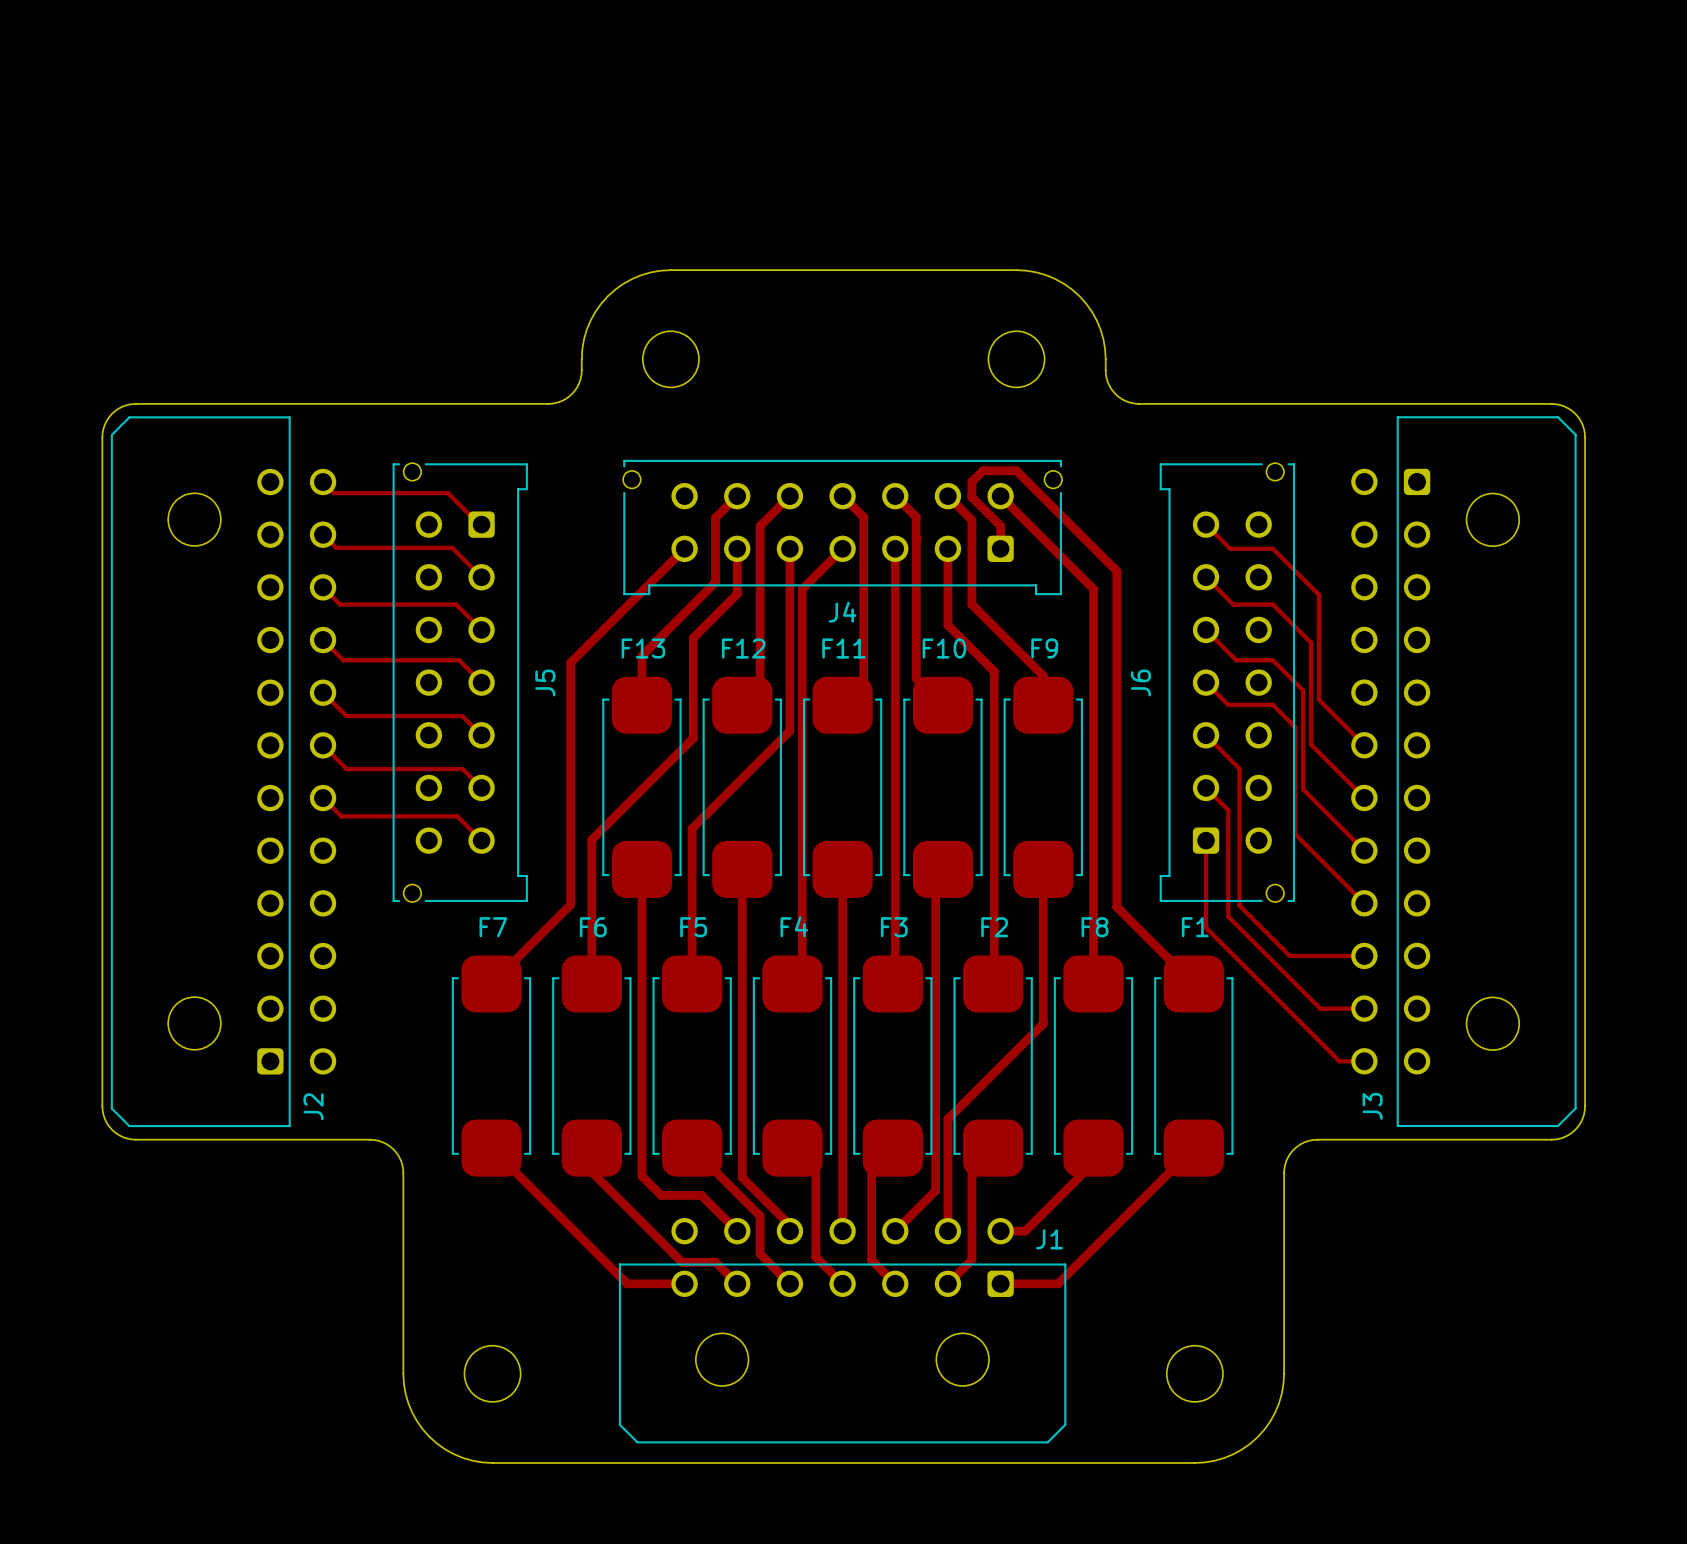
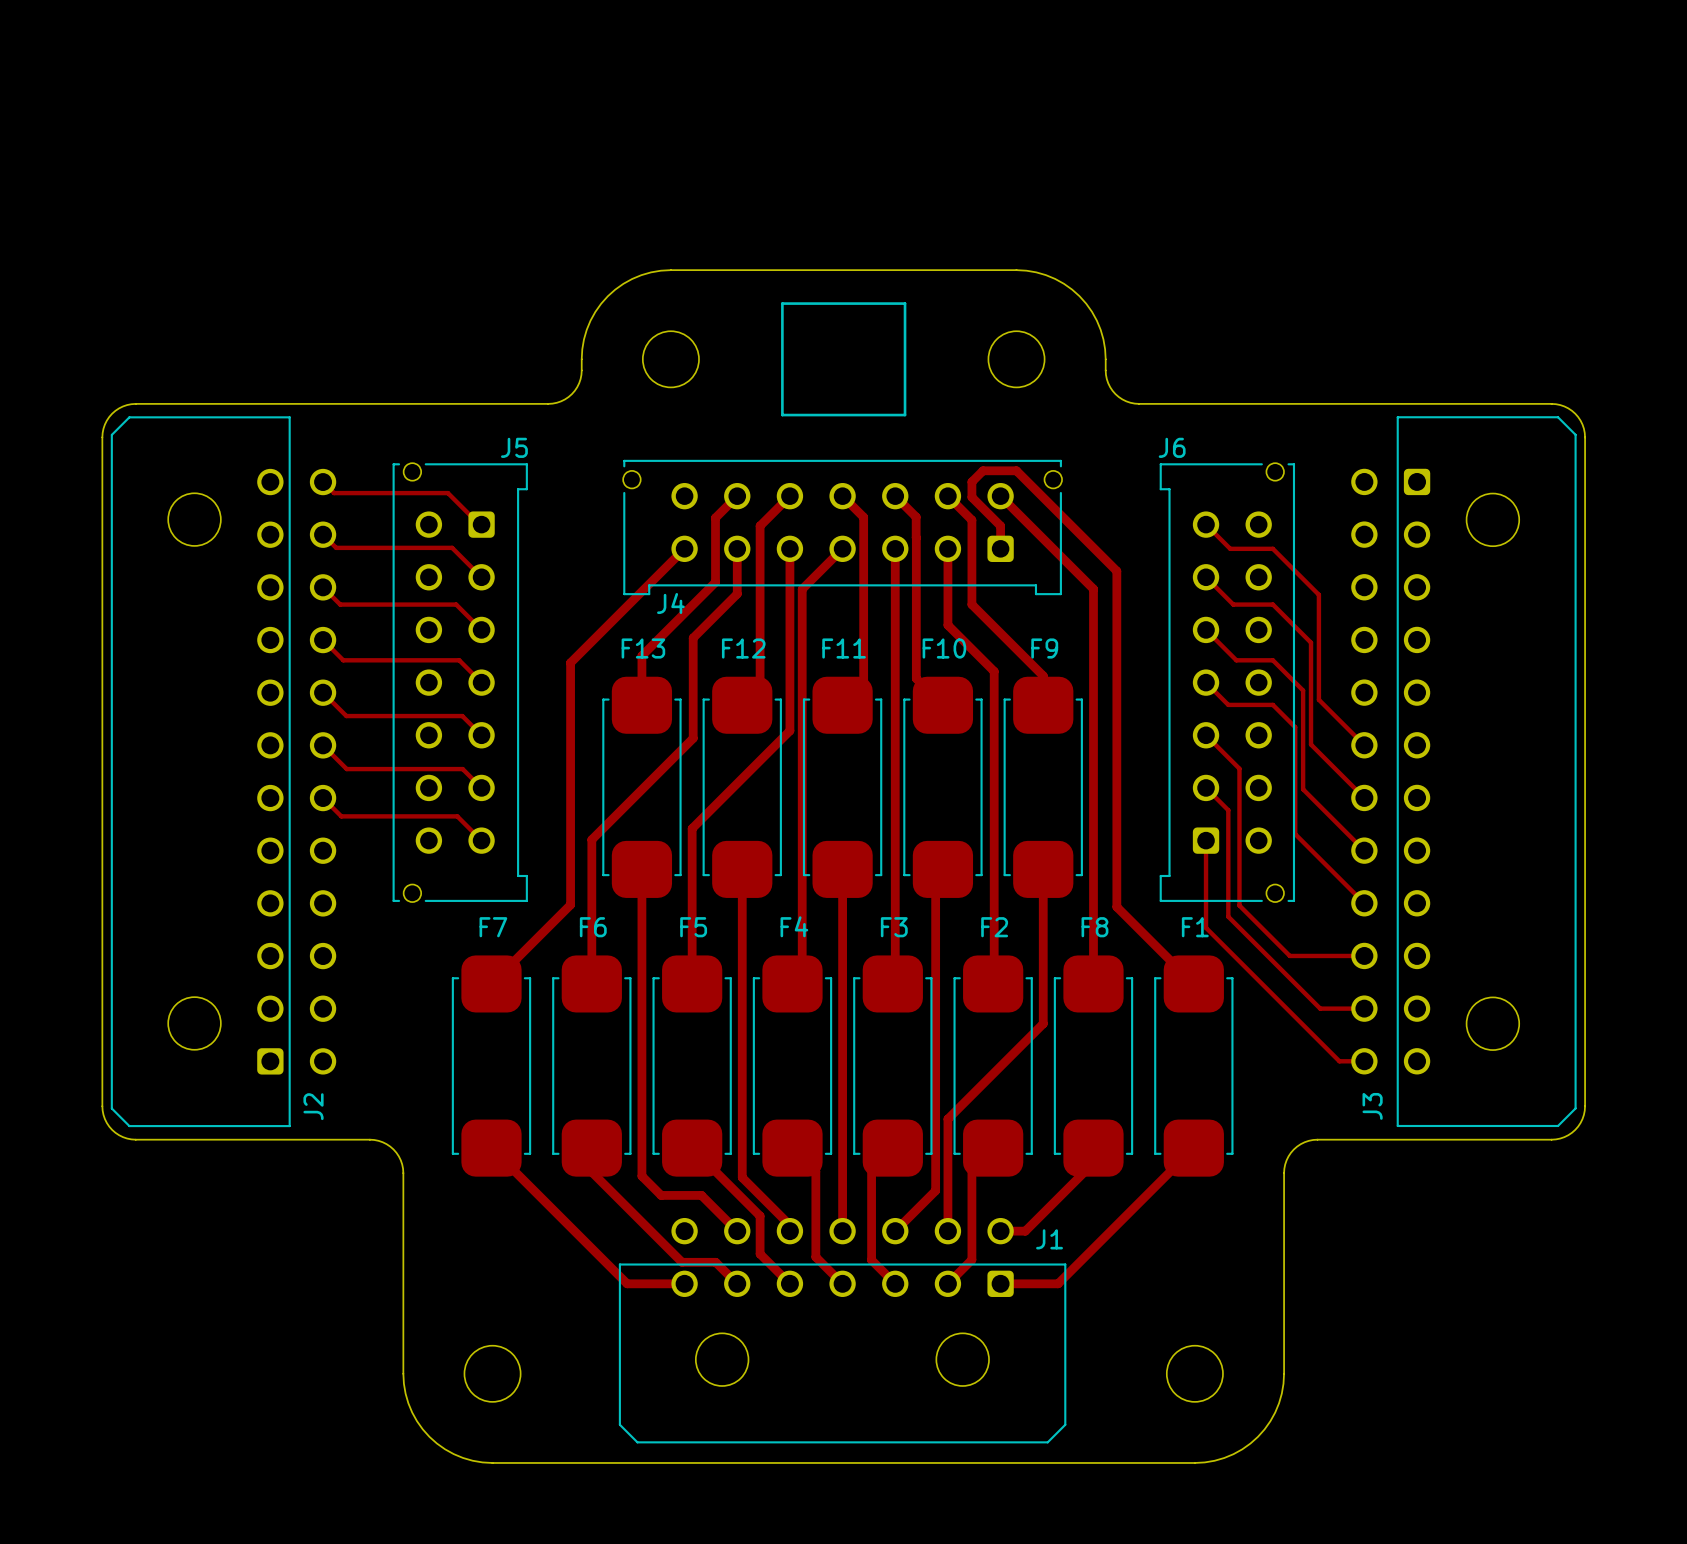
line: none -> (782, 303) (905, 303) (905, 415) (782, 415) (782, 303)
J4 name position: J4 (842, 612) -> J4 (670, 603)
J5 name rotation: 0° (545, 683) -> 90° clockwise (514, 447)
J5 name position: J5 (545, 683) -> J5 (514, 447)
J6 name rotation: 0° (1140, 683) -> 90° clockwise (1172, 447)
J6 name position: J6 (1140, 683) -> J6 (1172, 447)

